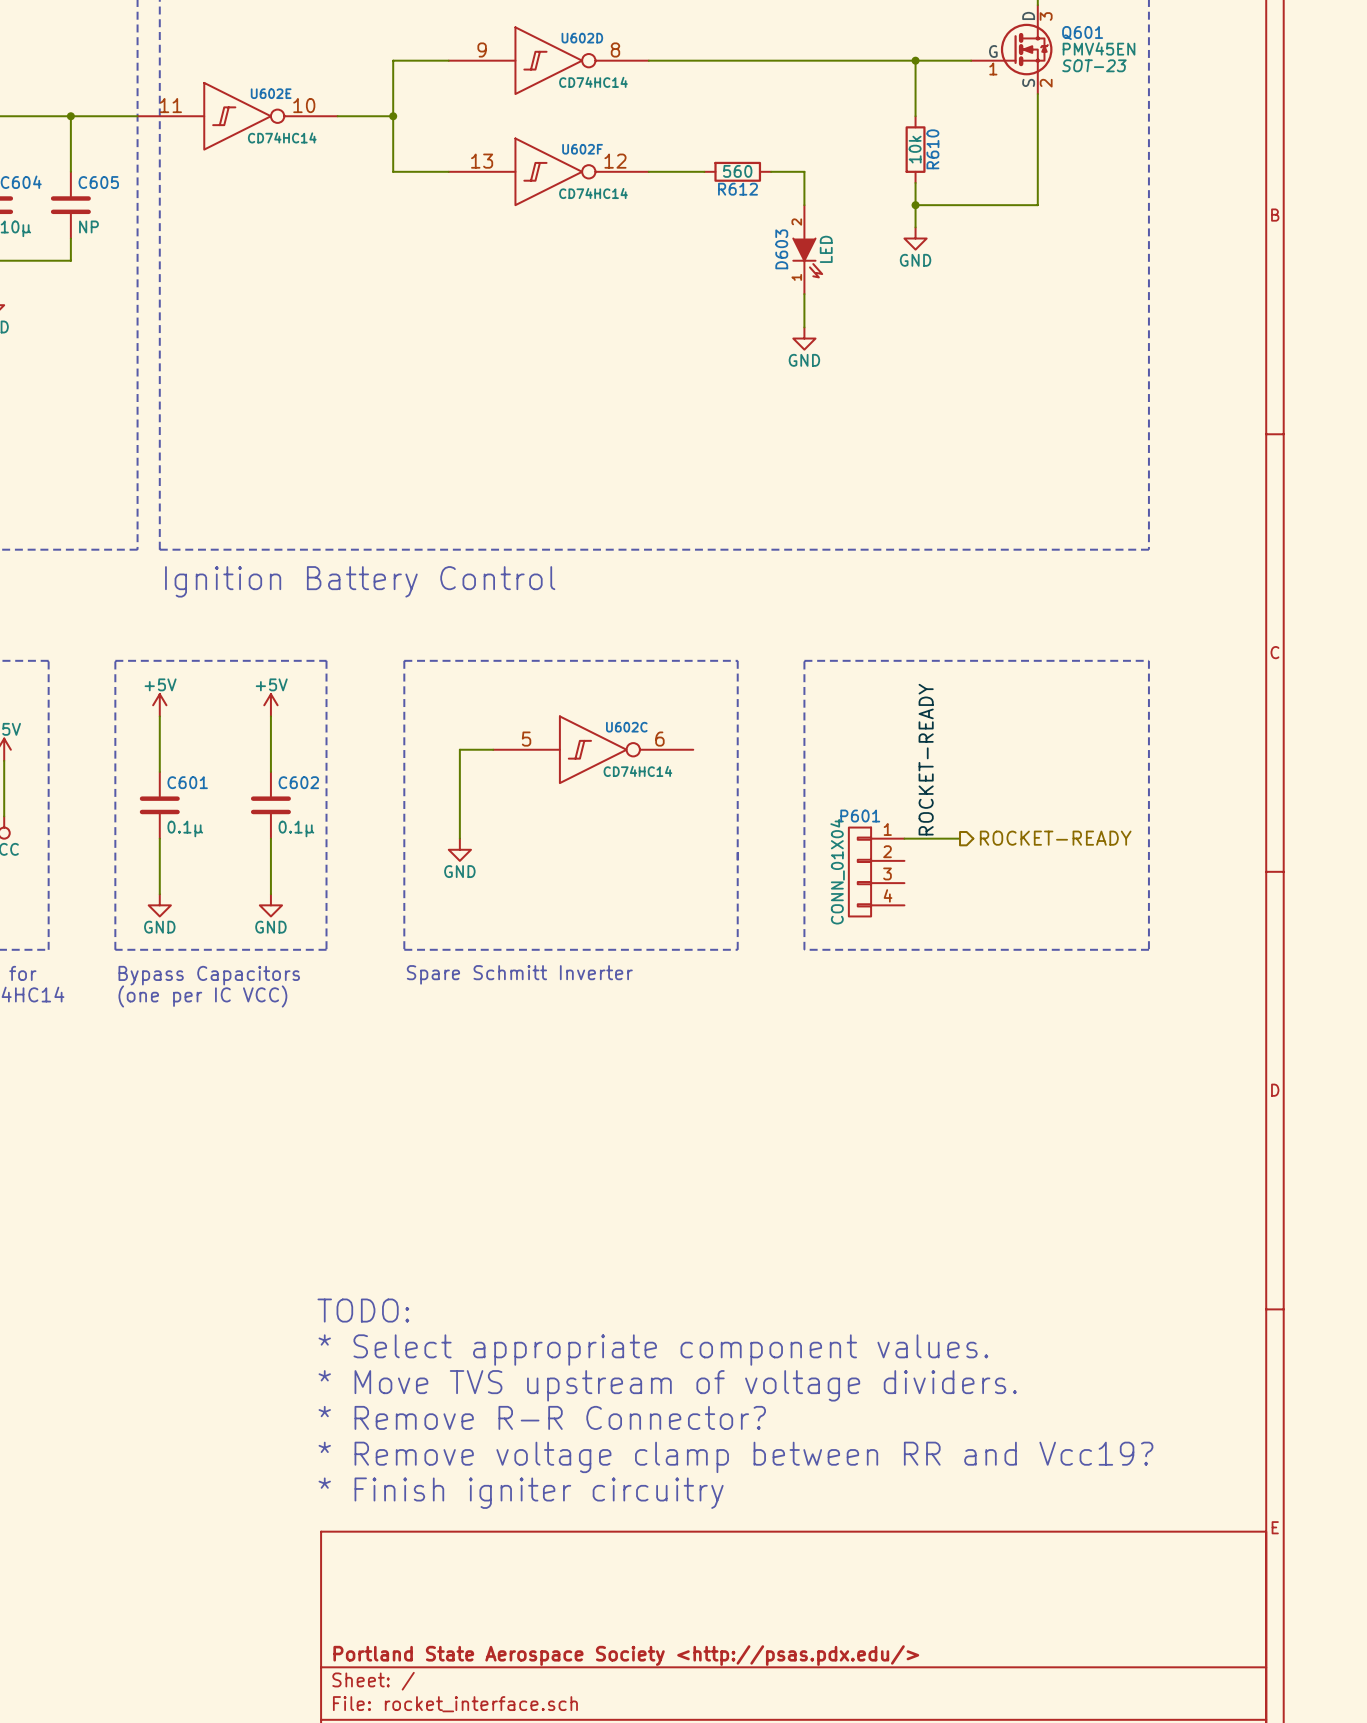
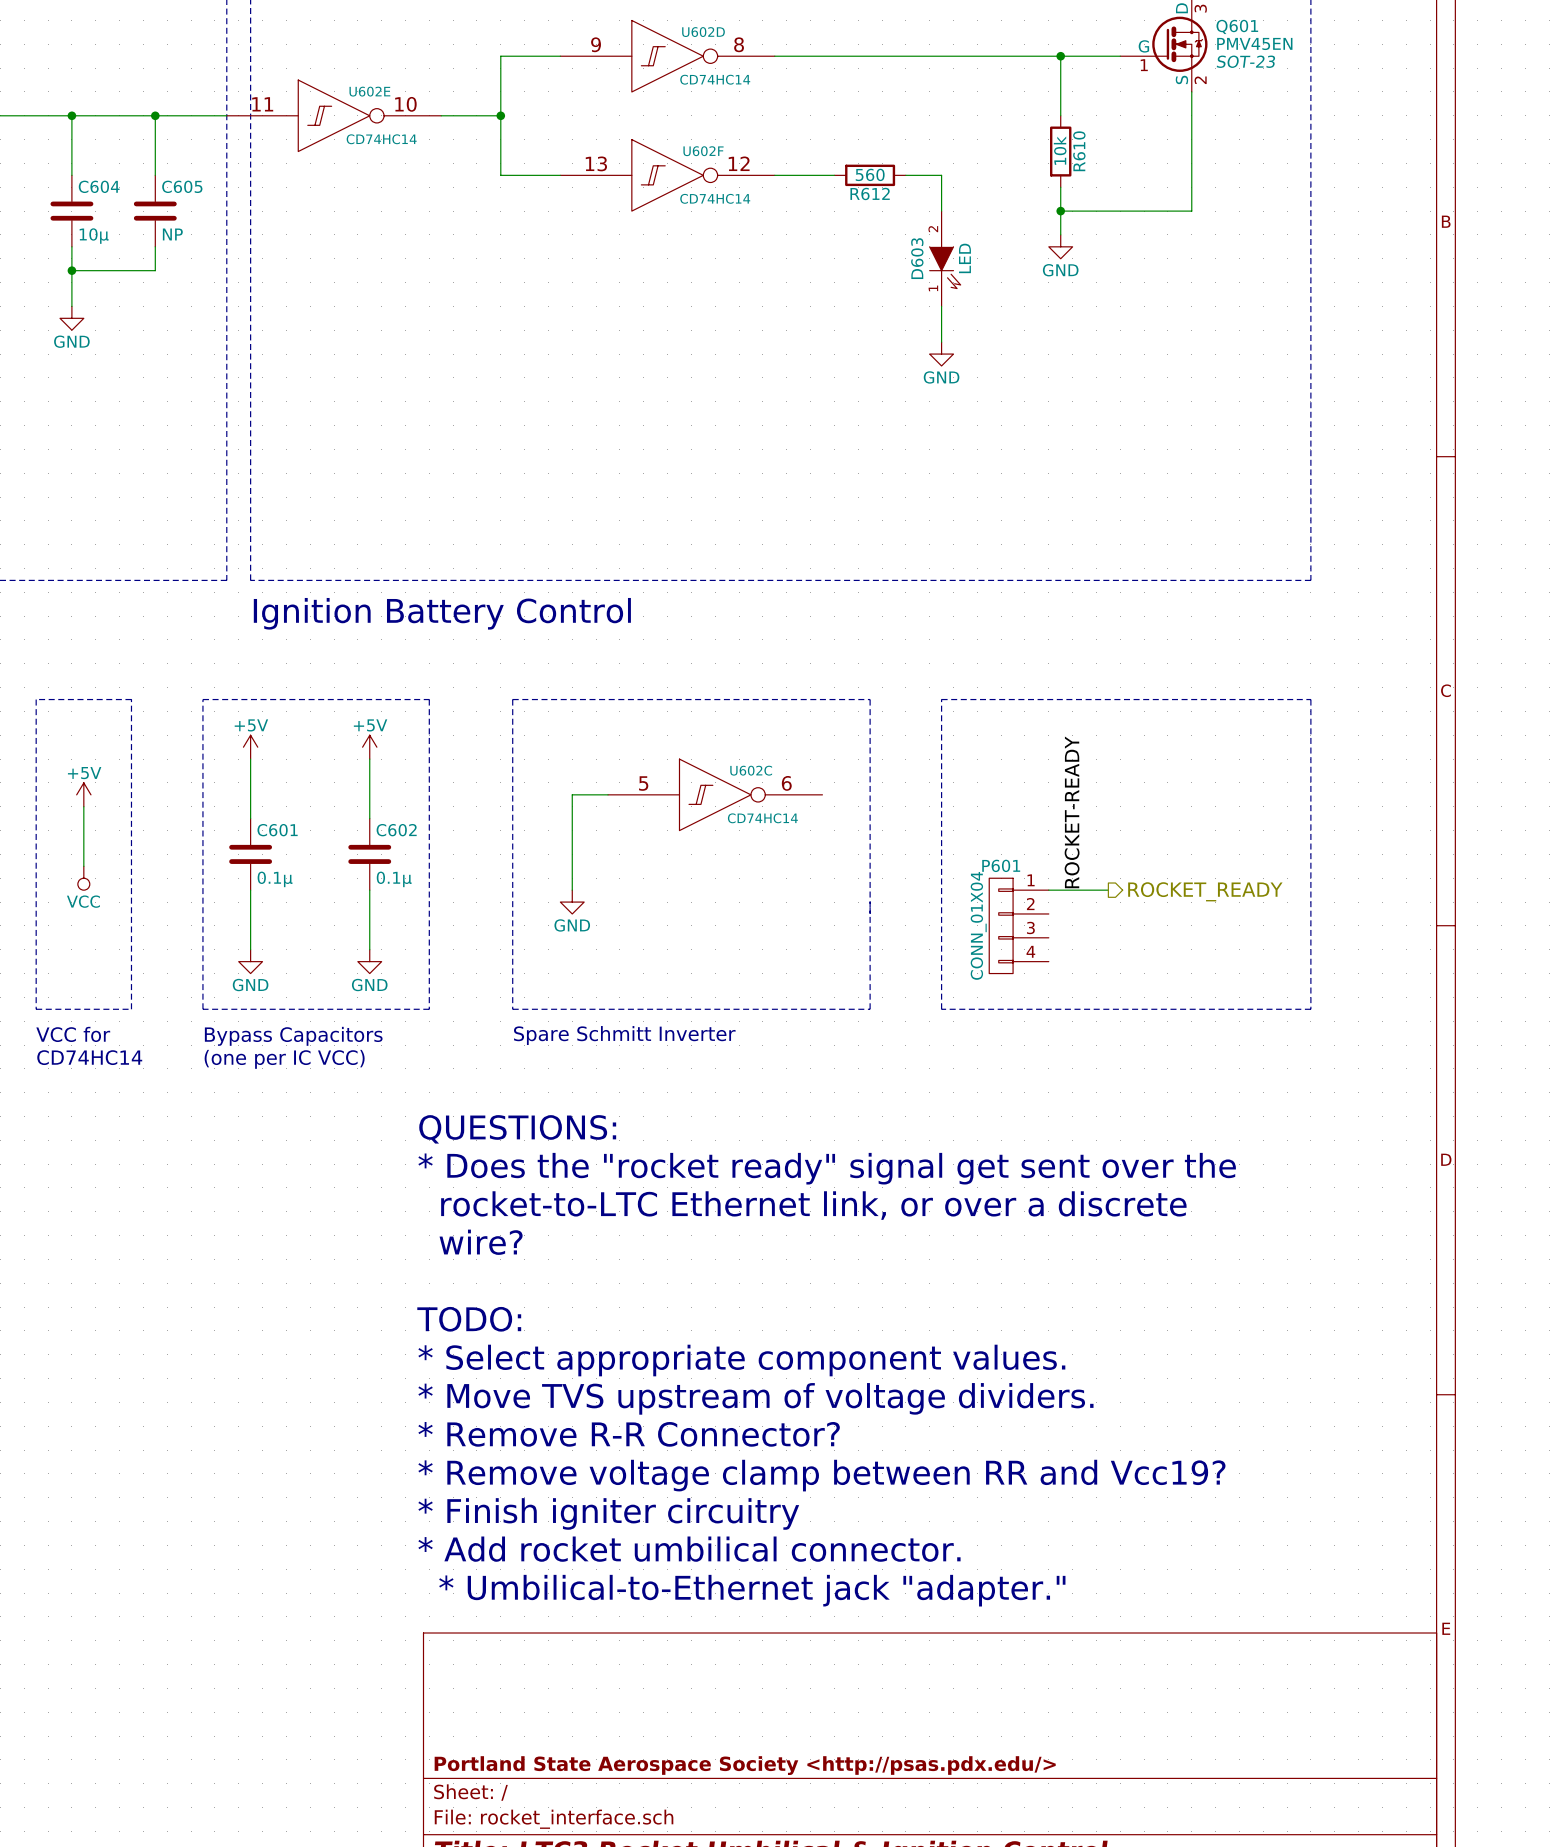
hierarchical label: ROCKET-READY (1055, 838) -> ROCKET_READY (1205, 891)
text: none -> QUESTIONS: (517, 1129)
text: none -> * Does the "rocket ready" signal get sent over the (827, 1168)
text: none -> rocket-to-LTC Ethernet link, or over a discrete (813, 1205)
text: none -> wire? (481, 1242)
text: none -> TODO: (469, 1319)
text: none -> * Select appropriate component values. (741, 1360)
text: TODO: (363, 1310) -> * Move TVS upstream of voltage dividers. (755, 1398)
text: * Select appropriate component values. (653, 1350) -> * Remove R-R Connector? (629, 1434)
text: * Move TVS upstream of voltage dividers. (667, 1385) -> * Remove voltage clamp between RR and Vcc19? (821, 1475)
text: * Remove R-R Connector? (542, 1417) -> * Finish igniter circuitry (608, 1513)
text: * Remove voltage clamp between RR and Vcc19? (735, 1457) -> * Add rocket umbilical connector. (689, 1549)
text: * Finish igniter circuitry (521, 1493) -> * Umbilical-to-Ethernet jack "adapter." (752, 1590)

